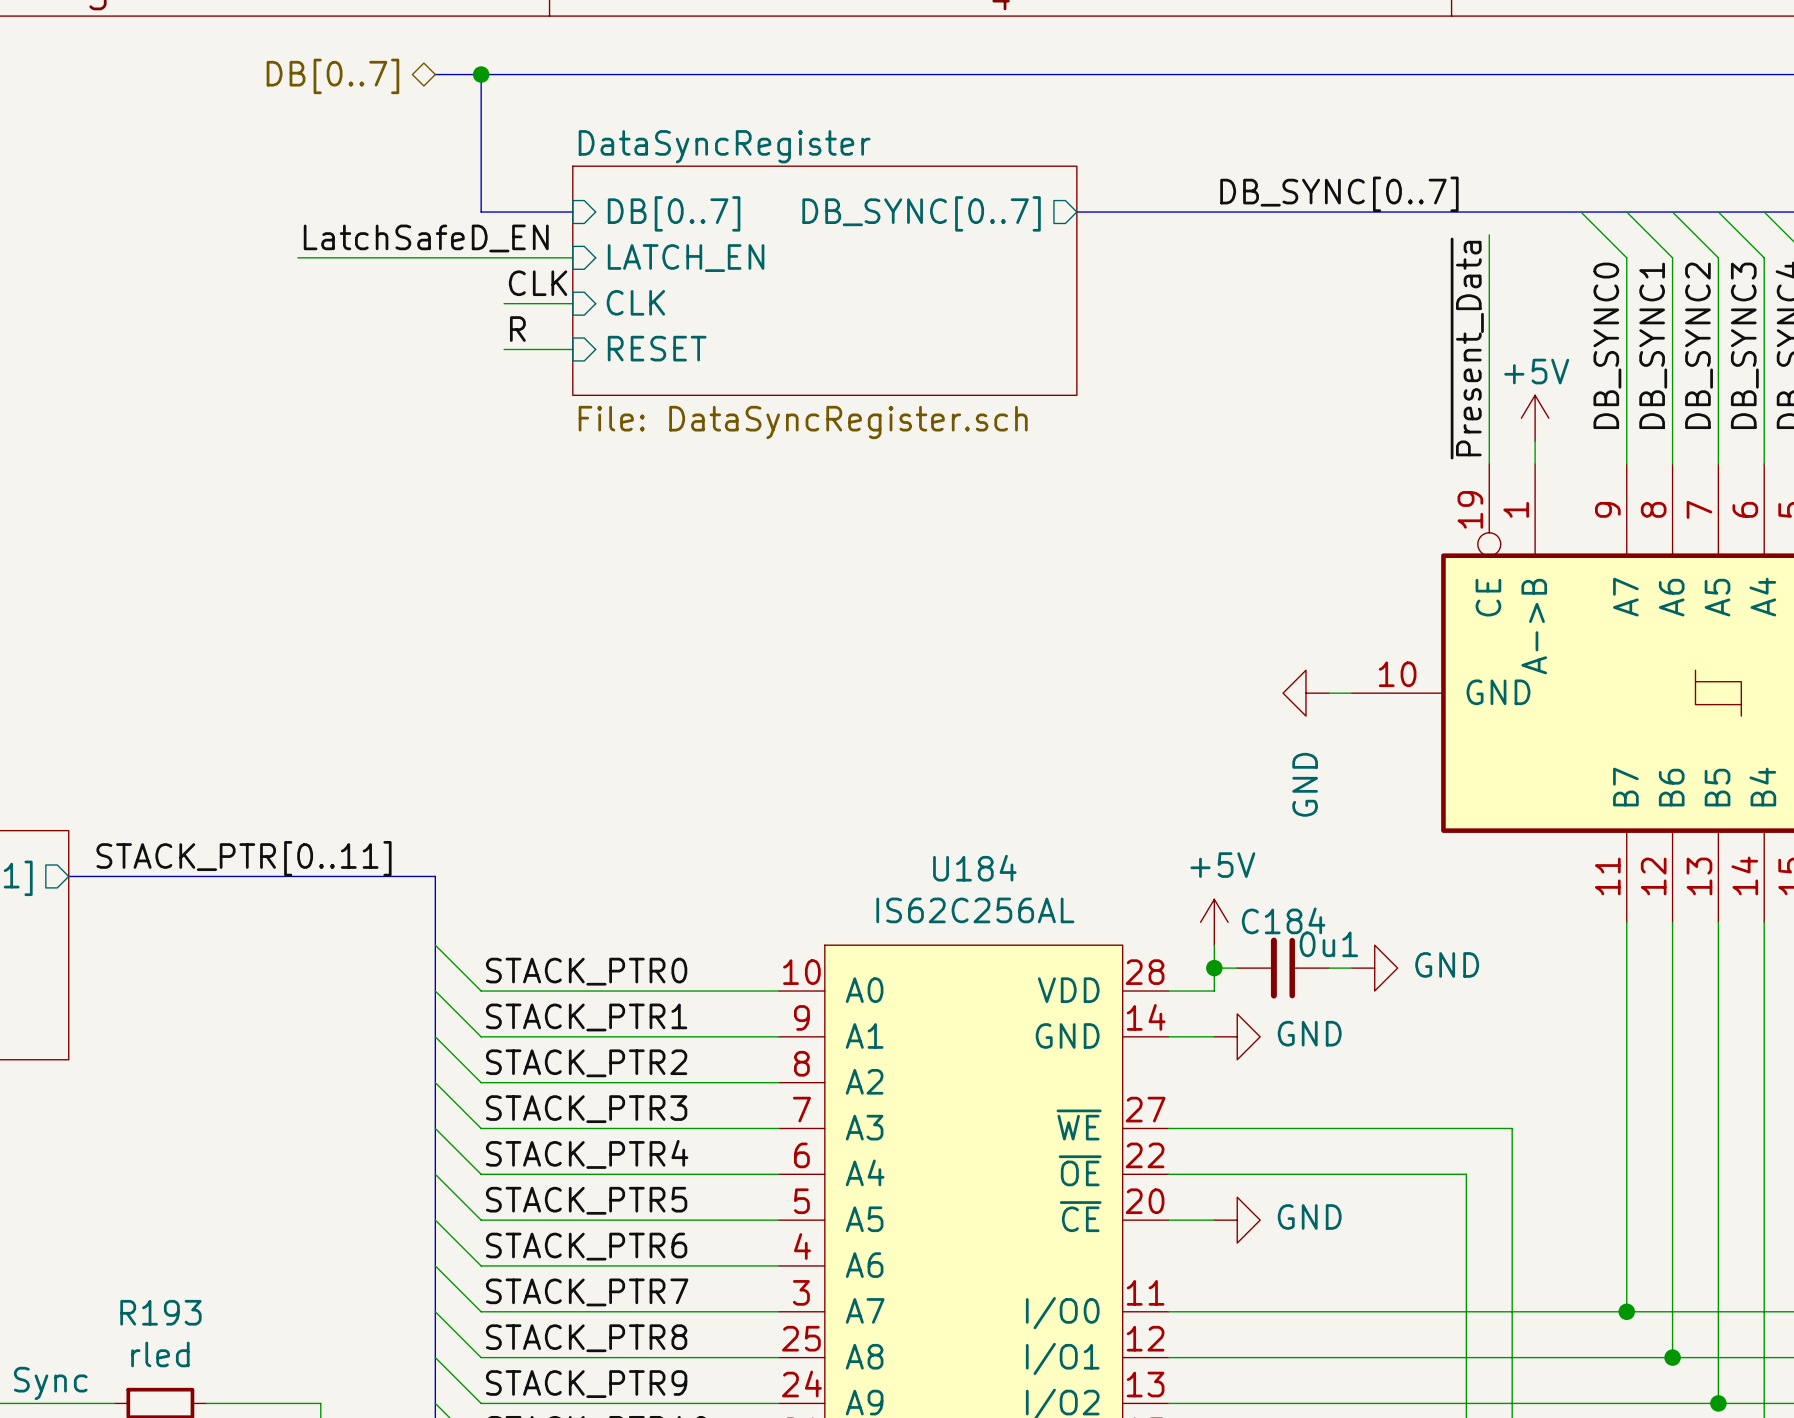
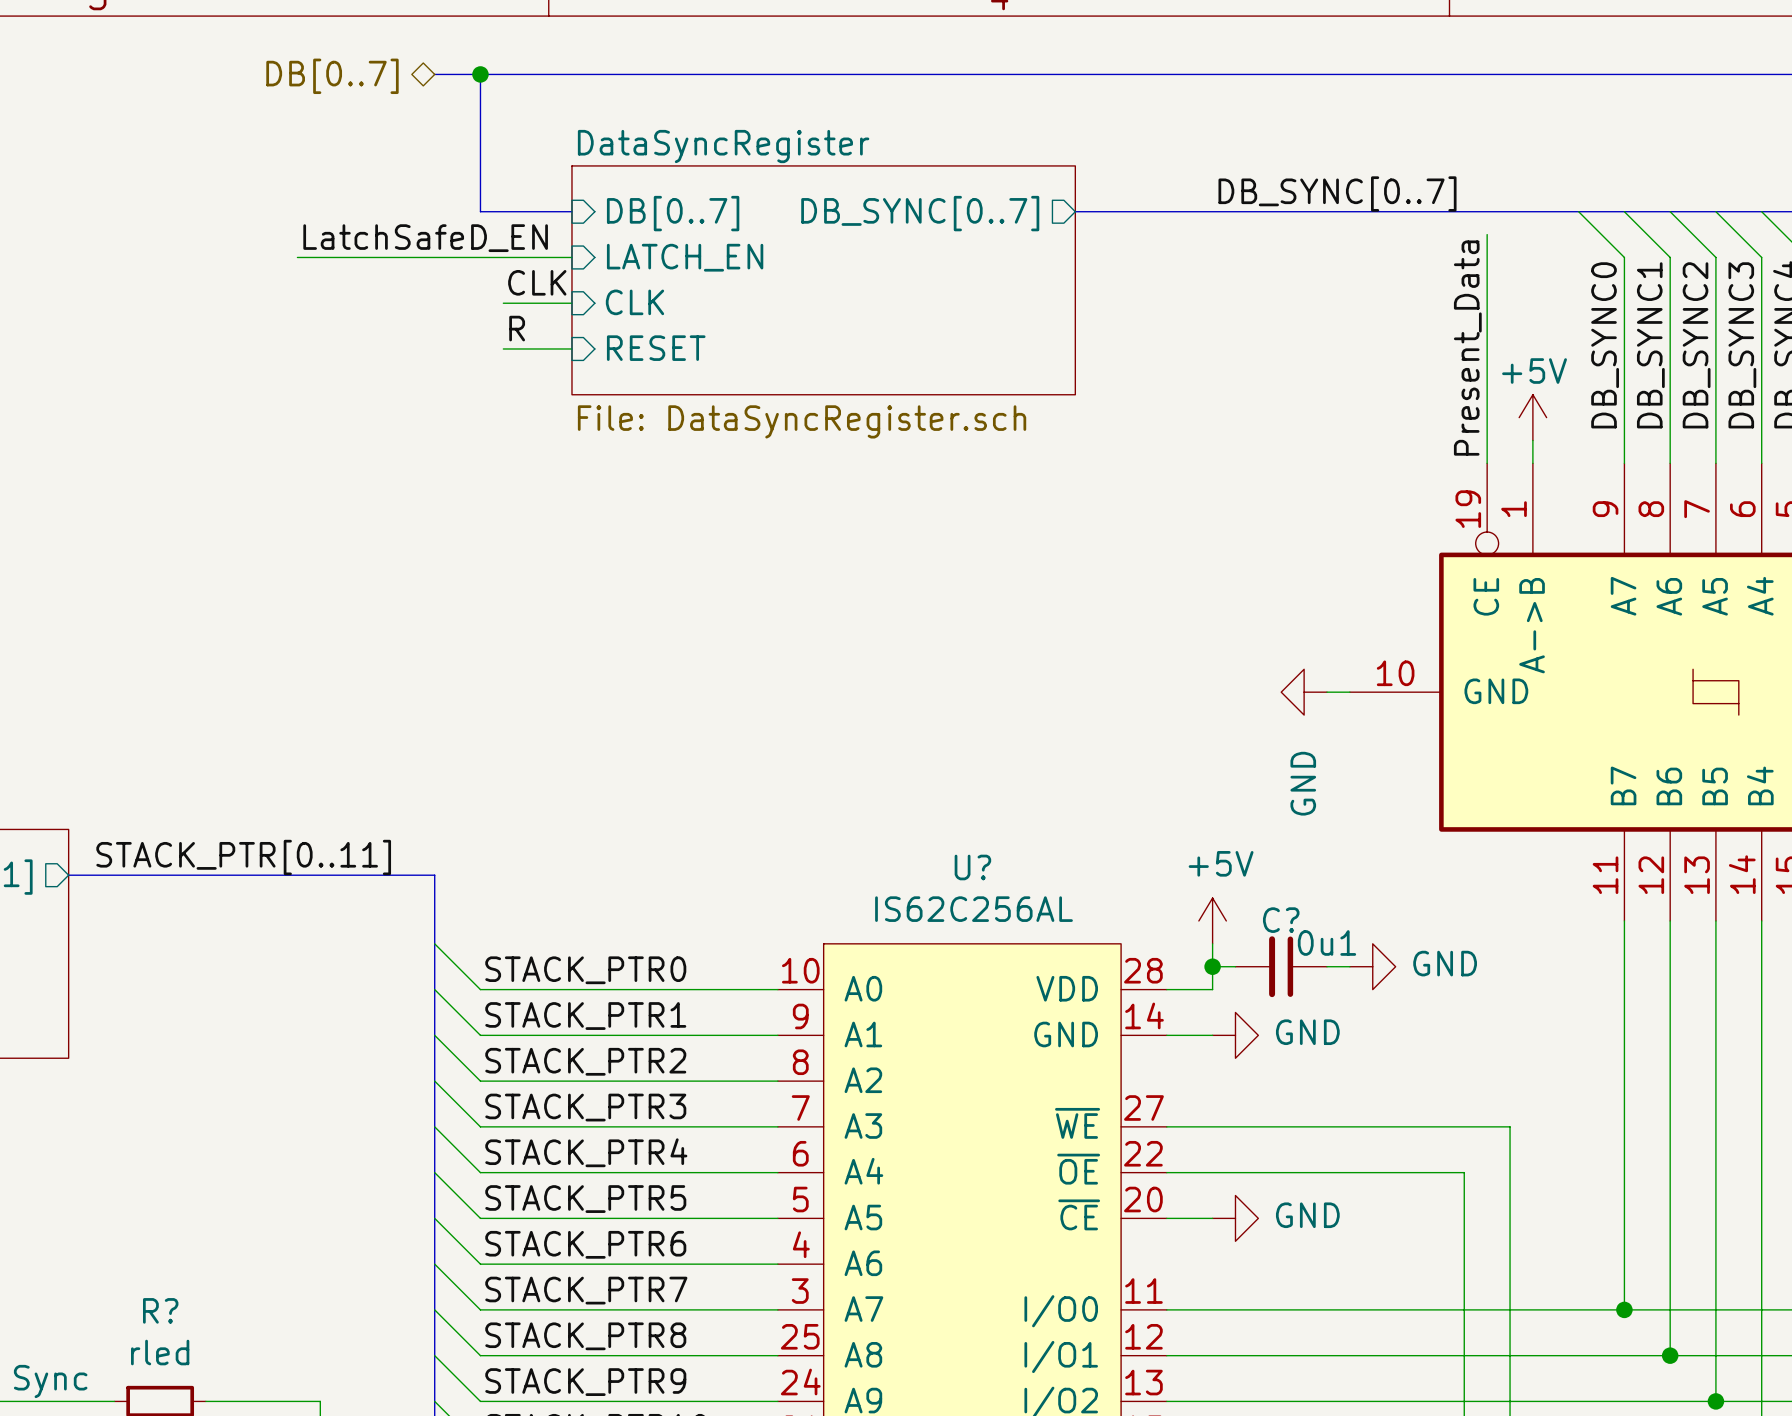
label: ~{Present_Data} (1467, 348) -> Present_Data (1467, 348)
U184 name: U184 (974, 868) -> U? (972, 867)
C184 name: C184 (1283, 920) -> C? (1281, 920)
R193 name: R193 (160, 1312) -> R? (160, 1310)

